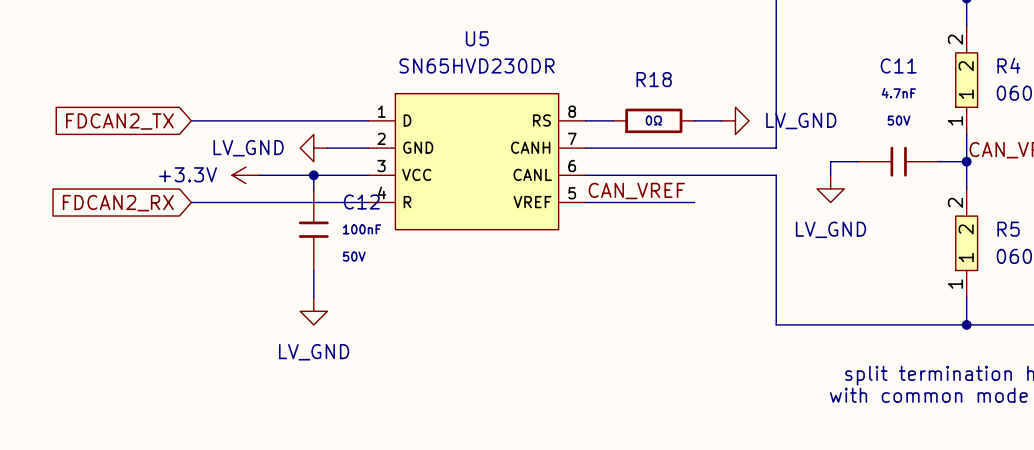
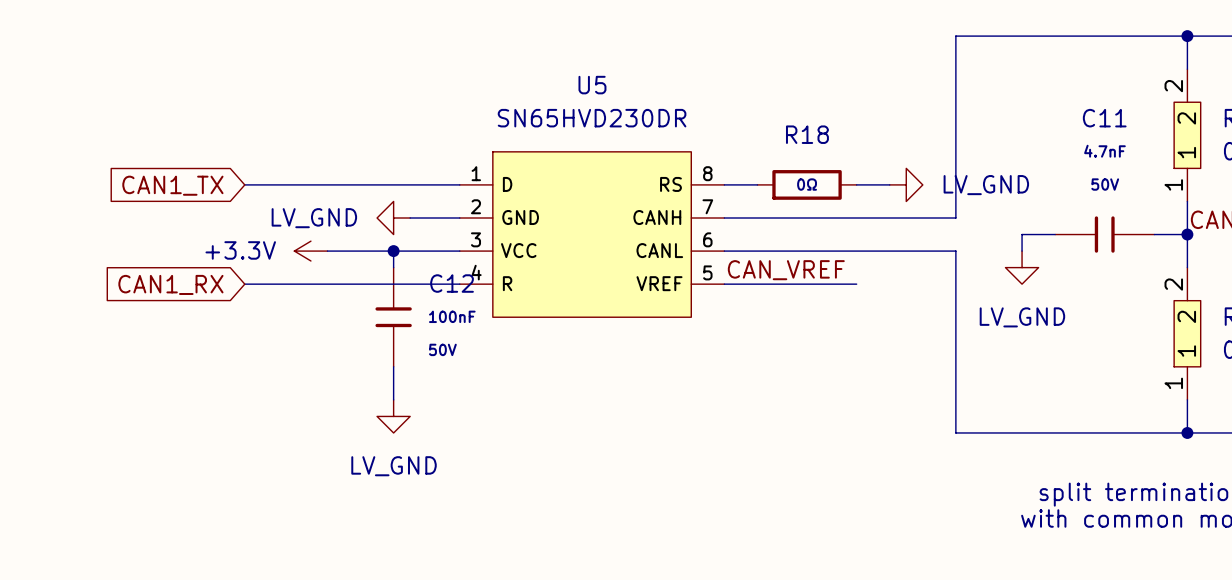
global label: FDCAN2_TX (119, 121) -> CAN1_TX (172, 185)
global label: FDCAN2_RX (118, 203) -> CAN1_RX (170, 284)

